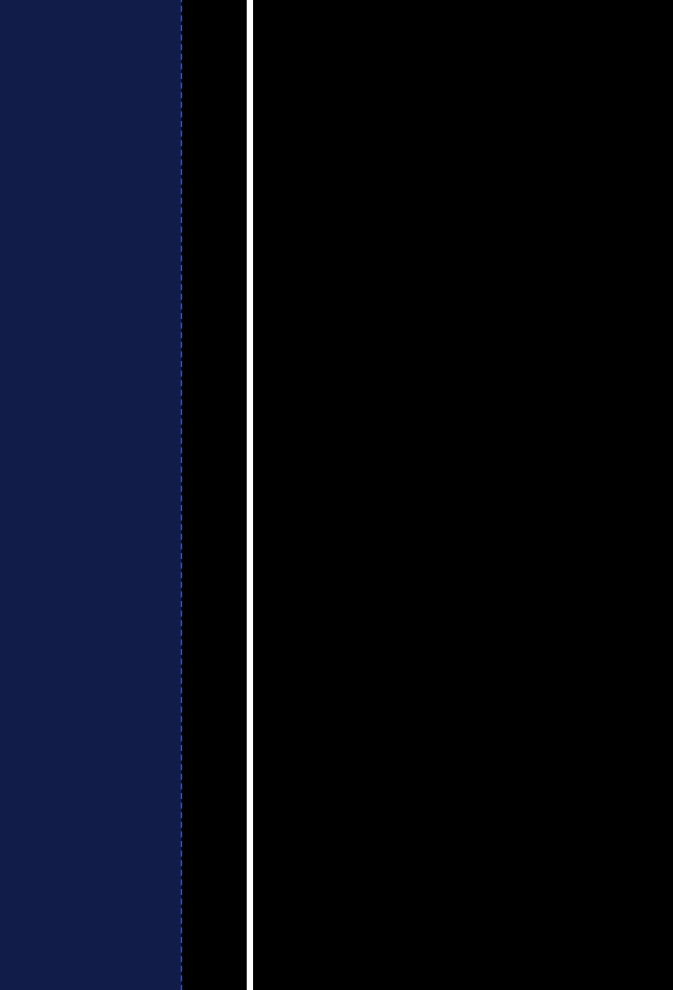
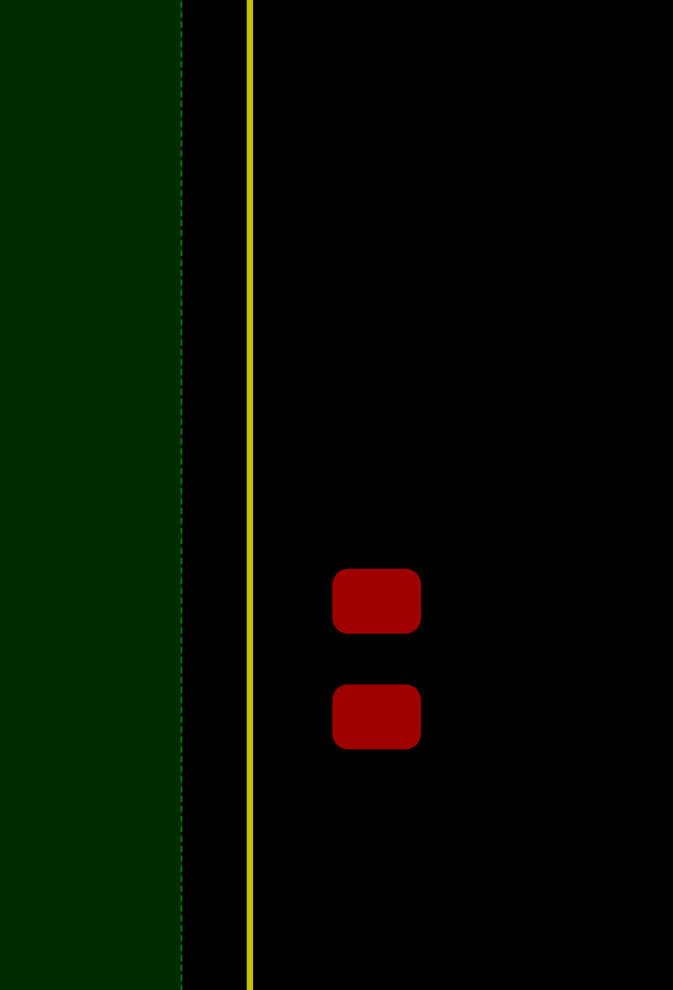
part: none -> (376, 659)

